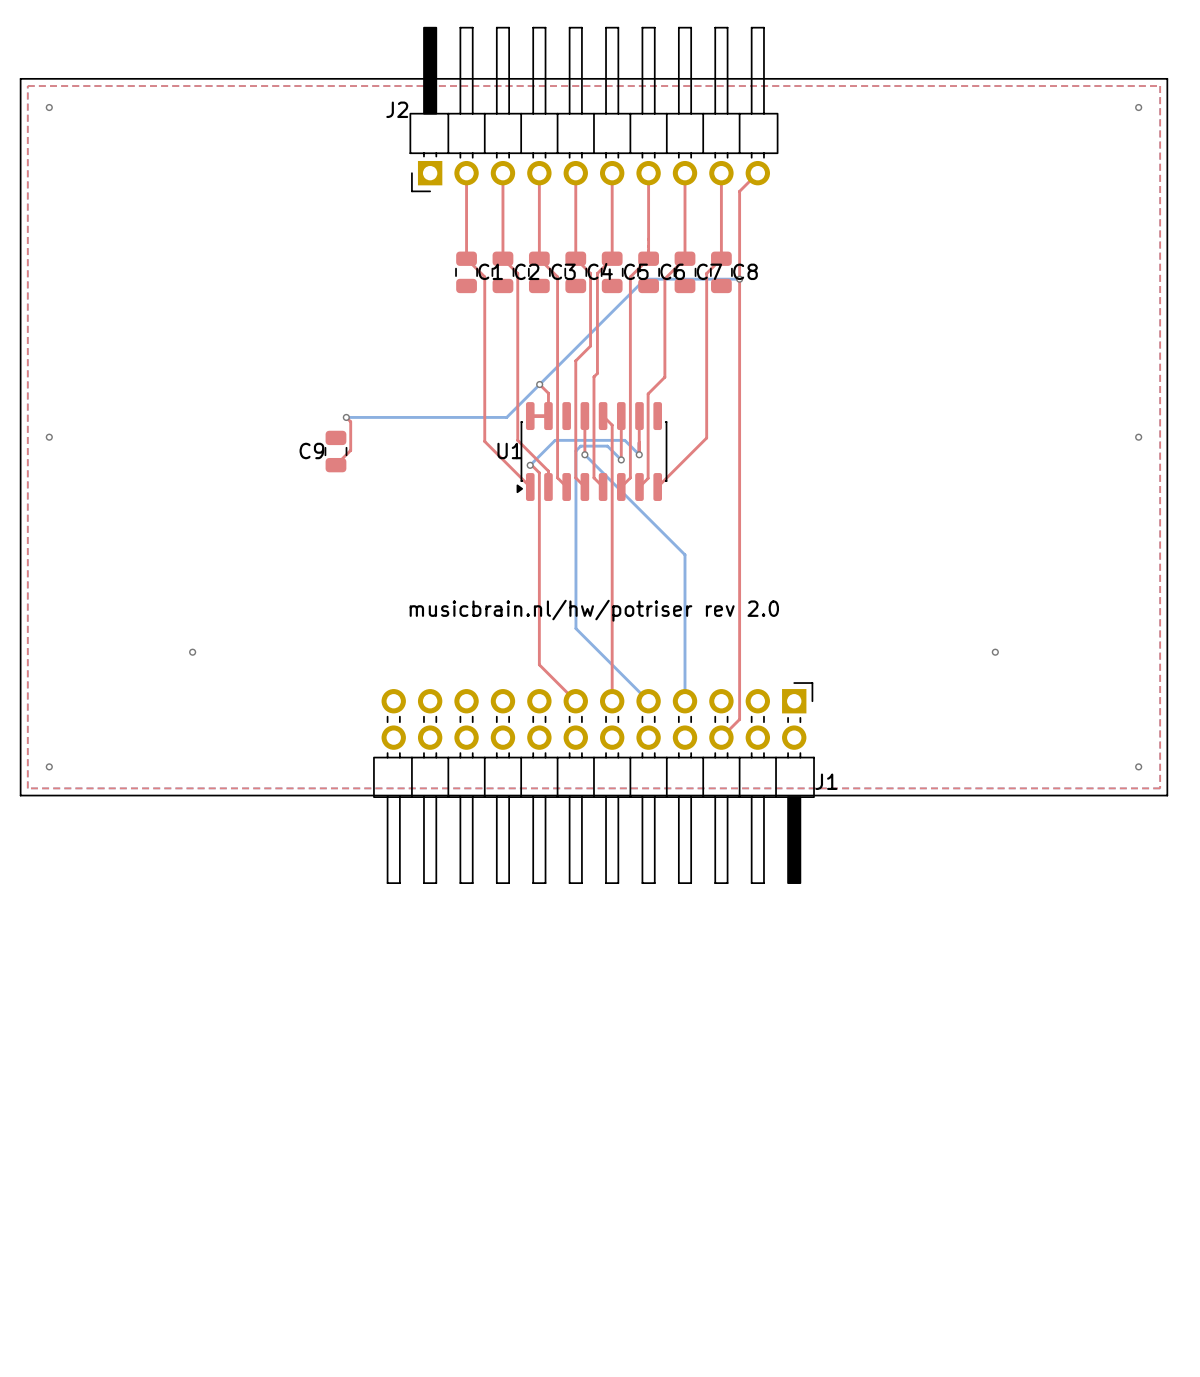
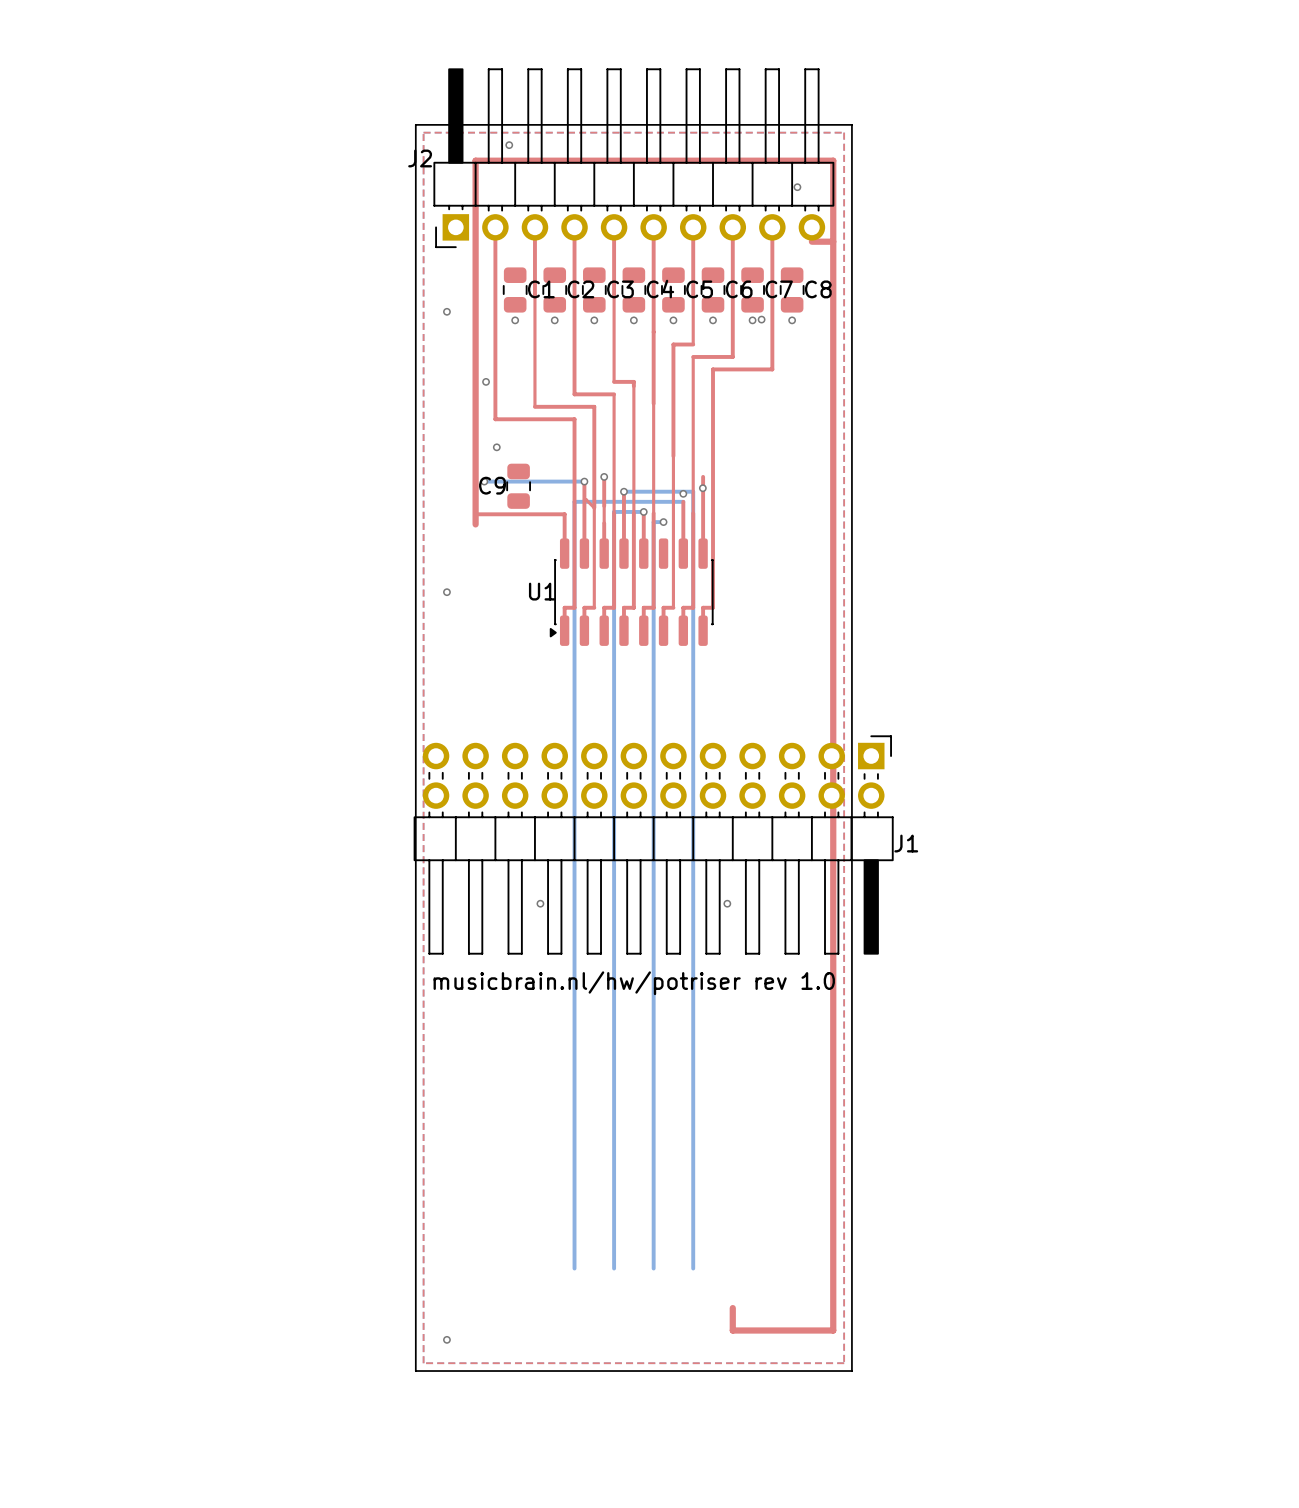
board edge: (20, 78) (1167, 78) (1167, 795) (20, 795) (20, 78) -> none
top zone outline: (27, 86) (1160, 86) (1160, 788) (27, 788) (27, 86) -> none
via: (49, 107) -> none
via: (1138, 107) -> none
J2 position: (593, 109) -> (633, 158)
board edge: none -> (415, 124) (851, 124) (851, 1371) (415, 1371) (415, 124)
top zone outline: none -> (423, 132) (844, 132) (844, 1363) (423, 1363) (423, 132)
via: none -> (509, 145)
top track: (466, 173) (466, 258) (484, 276) -> (534, 227) (534, 294)
top track: (502, 173) (502, 258) (517, 273) (517, 440) (548, 471) -> (604, 476) (604, 506)
top track: (539, 173) (539, 258) (557, 276) -> (614, 227) (614, 294)
top track: (575, 173) (575, 258) (590, 273) (590, 346) (575, 360) -> none
top track: (612, 173) (612, 258) (597, 273) (597, 373) (593, 376) -> (653, 227) (653, 403)
top track: (648, 173) (648, 258) (630, 276) -> (693, 227) (693, 294)
top track: (685, 173) (685, 258) (664, 278) (664, 377) (648, 393) (648, 478) (639, 487) -> none
top track: (721, 173) (721, 258) (706, 273) (706, 438) (657, 487) -> none
top track: (757, 173) (739, 191) (739, 214) -> none
via: none -> (797, 187)
top track: none -> (495, 227) (495, 419) (574, 419) (574, 607) (564, 607) (564, 630)
top track: none -> (574, 227) (574, 394) (614, 394)
top track: none -> (732, 227) (732, 356) (693, 356)
top track: none -> (772, 227) (772, 369) (713, 369) (713, 607) (703, 607) (703, 630)
top track: (739, 227) (739, 719) (721, 737) -> (811, 241) (833, 241)
bottom track: (739, 279) (645, 279) (506, 417) (346, 417) -> none
via: (739, 279) -> none
via: none -> (446, 311)
via: none -> (761, 319)
via: none -> (515, 320)
via: none -> (554, 320)
via: none -> (594, 320)
via: none -> (633, 320)
via: none -> (673, 320)
via: none -> (713, 320)
via: none -> (752, 320)
via: none -> (792, 320)
top track: (630, 322) (630, 333) -> (693, 344) (673, 344) (673, 456)
via: none -> (486, 381)
top track: (557, 356) (557, 368) -> (614, 381) (633, 381) (633, 386)
top track: (484, 379) (484, 441) (530, 487) -> (534, 406) (594, 406) (594, 507)
top track: (539, 384) (548, 393) (548, 416) (530, 416) -> none
via: (539, 384) -> none
top track: (584, 416) (584, 454) -> none
top track: (603, 416) (612, 425) -> none
top track: (621, 416) (621, 459) -> none
top track: (639, 416) (639, 454) -> none
top track: (346, 417) (350, 421) (350, 450) (335, 465) -> none
via: (346, 417) -> none
via: none -> (496, 447)
via: (49, 437) -> none
via: (1138, 437) -> none
bottom track: (639, 442) (639, 454) (624, 440) (555, 440) (530, 465) -> none
via: none -> (604, 476)
top track: none -> (703, 476) (703, 553)
bottom track: none -> (484, 481) (584, 481)
via: none -> (484, 481)
top track: none -> (584, 481) (584, 553)
via: none -> (584, 481)
C9 position: (335, 451) -> (518, 486)
U1 position: (591, 451) -> (631, 592)
bottom track: (584, 454) (685, 554) (685, 701) -> none
via: (584, 454) -> none
bottom track: none -> (623, 491) (693, 491) (693, 1268)
top track: none -> (623, 491) (623, 553)
via: none -> (623, 491)
bottom track: (621, 459) (607, 446) (580, 446) (575, 450) (575, 628) (648, 701) -> none
via: (530, 465) -> none
bottom track: none -> (683, 501) (574, 501) (574, 1268)
top track: none -> (683, 501) (683, 553)
bottom track: none -> (643, 511) (614, 511) (614, 1268)
top track: none -> (643, 511) (643, 553)
via: none -> (643, 511)
top track: (557, 477) (566, 487) -> (614, 513) (614, 607) (604, 607) (604, 630)
top track: (575, 477) (584, 487) -> (633, 513) (633, 607) (623, 607) (623, 630)
top track: (593, 477) (603, 487) -> (653, 513) (653, 607) (643, 607) (643, 630)
top track: (630, 477) (621, 487) -> (693, 513) (693, 607) (683, 607) (683, 630)
top track: none -> (475, 514) (564, 514) (564, 553)
bottom track: none -> (663, 522) (653, 522) (653, 1268)
via: none -> (663, 522)
top track: none -> (604, 523) (604, 553)
top track: none -> (475, 524) (475, 160) (833, 160) (833, 1330) (732, 1330) (732, 1308)
via: none -> (446, 592)
top track: (539, 564) (539, 664) (575, 701) -> (594, 607) (584, 607) (584, 630)
top track: (612, 564) (612, 701) -> (673, 607) (663, 607) (663, 630)
text: musicbrain.nl/hw/potriser rev 2.0 (594, 610) -> none
via: (192, 652) -> none
via: (995, 652) -> none
via: (49, 766) -> none
via: (1138, 766) -> none
via: none -> (540, 903)
via: none -> (727, 903)
text: none -> musicbrain.nl/hw/potriser rev 1.0 (634, 983)
via: none -> (446, 1339)

